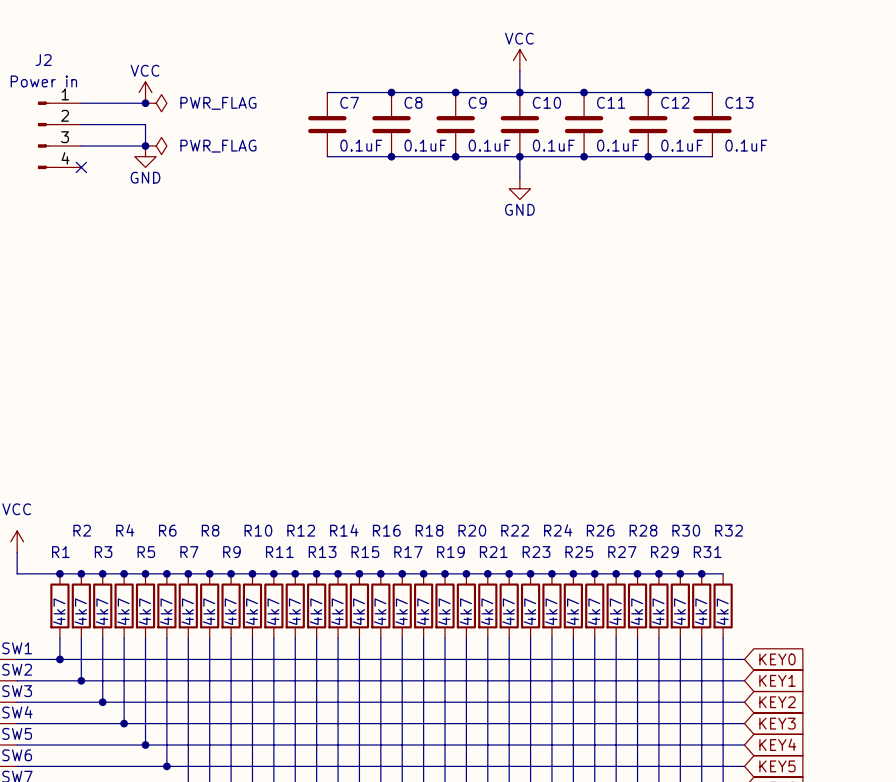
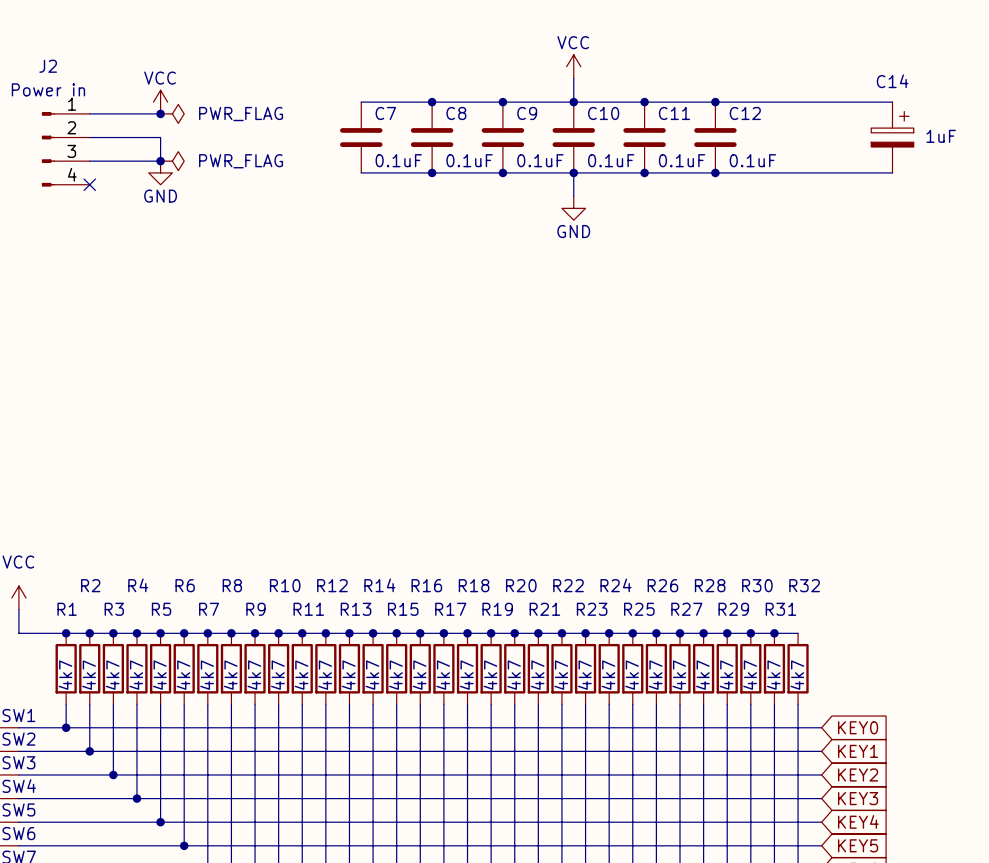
wire: none -> (786, 102) (892, 102)
C13: 0.1uF (712, 124) -> none
C14: none -> 1uF (892, 137)
wire: none -> (786, 172) (892, 172)

